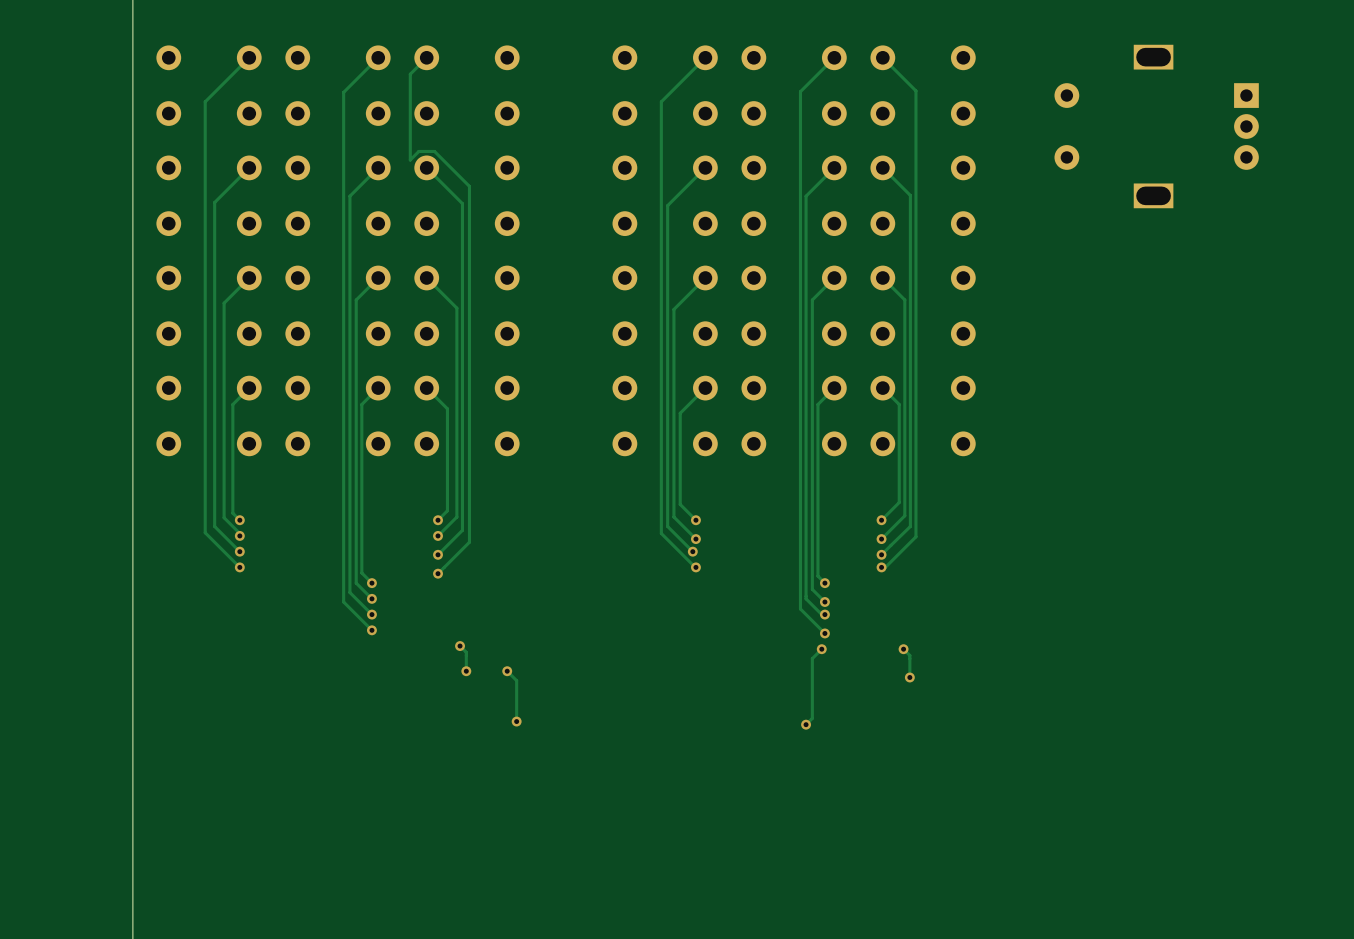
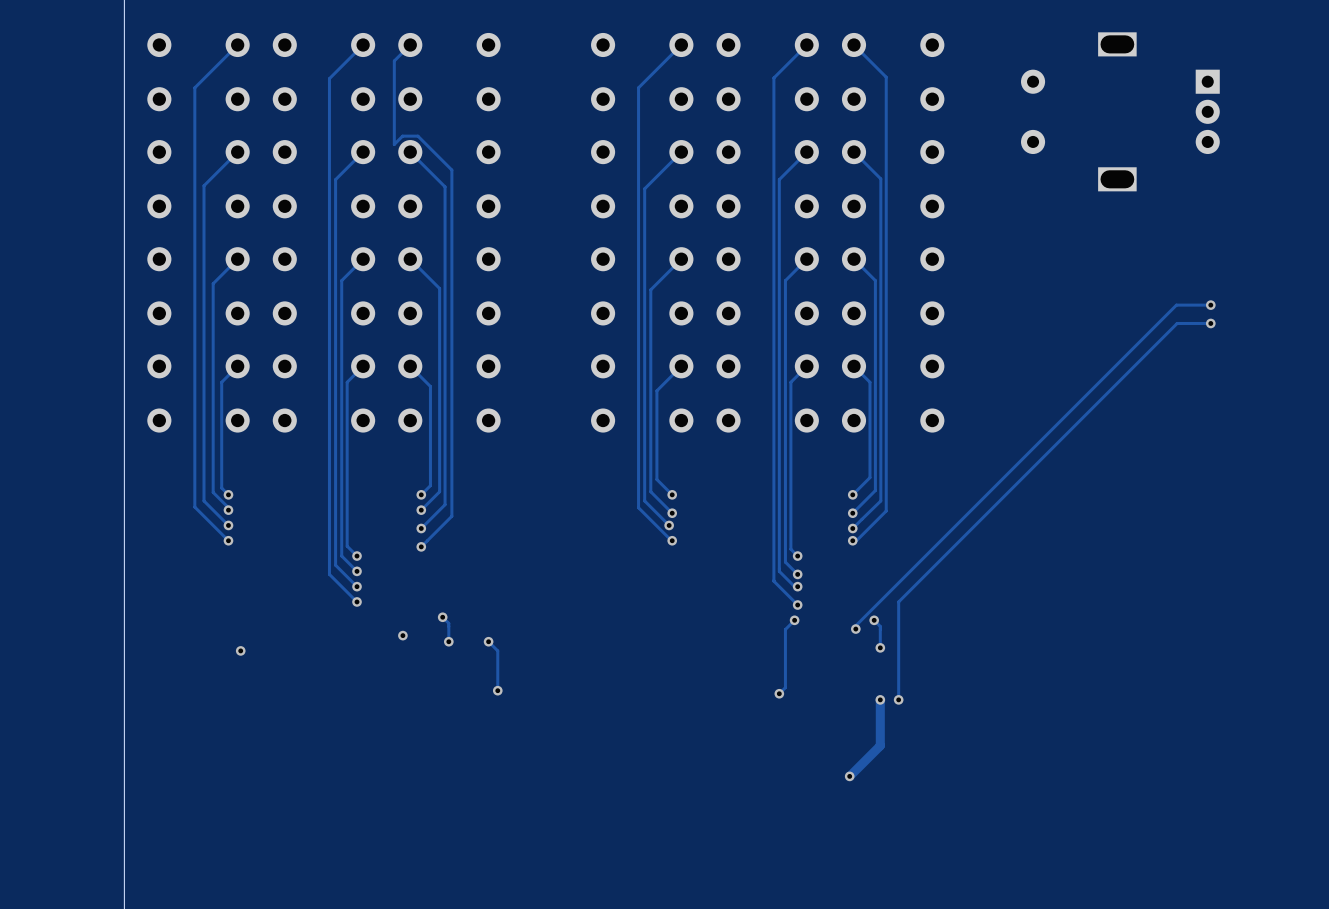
track: none -> (1210, 305) (1176, 305) (855, 625) (855, 629)
via: none -> (1210, 305)
track: none -> (1210, 323) (1177, 323) (898, 601) (898, 699)
via: none -> (1210, 323)
via: none -> (855, 629)
via: none -> (402, 635)
via: none -> (240, 650)
track: none -> (880, 699) (880, 745) (849, 776)
via: none -> (880, 699)
via: none -> (898, 699)
via: none -> (849, 776)

